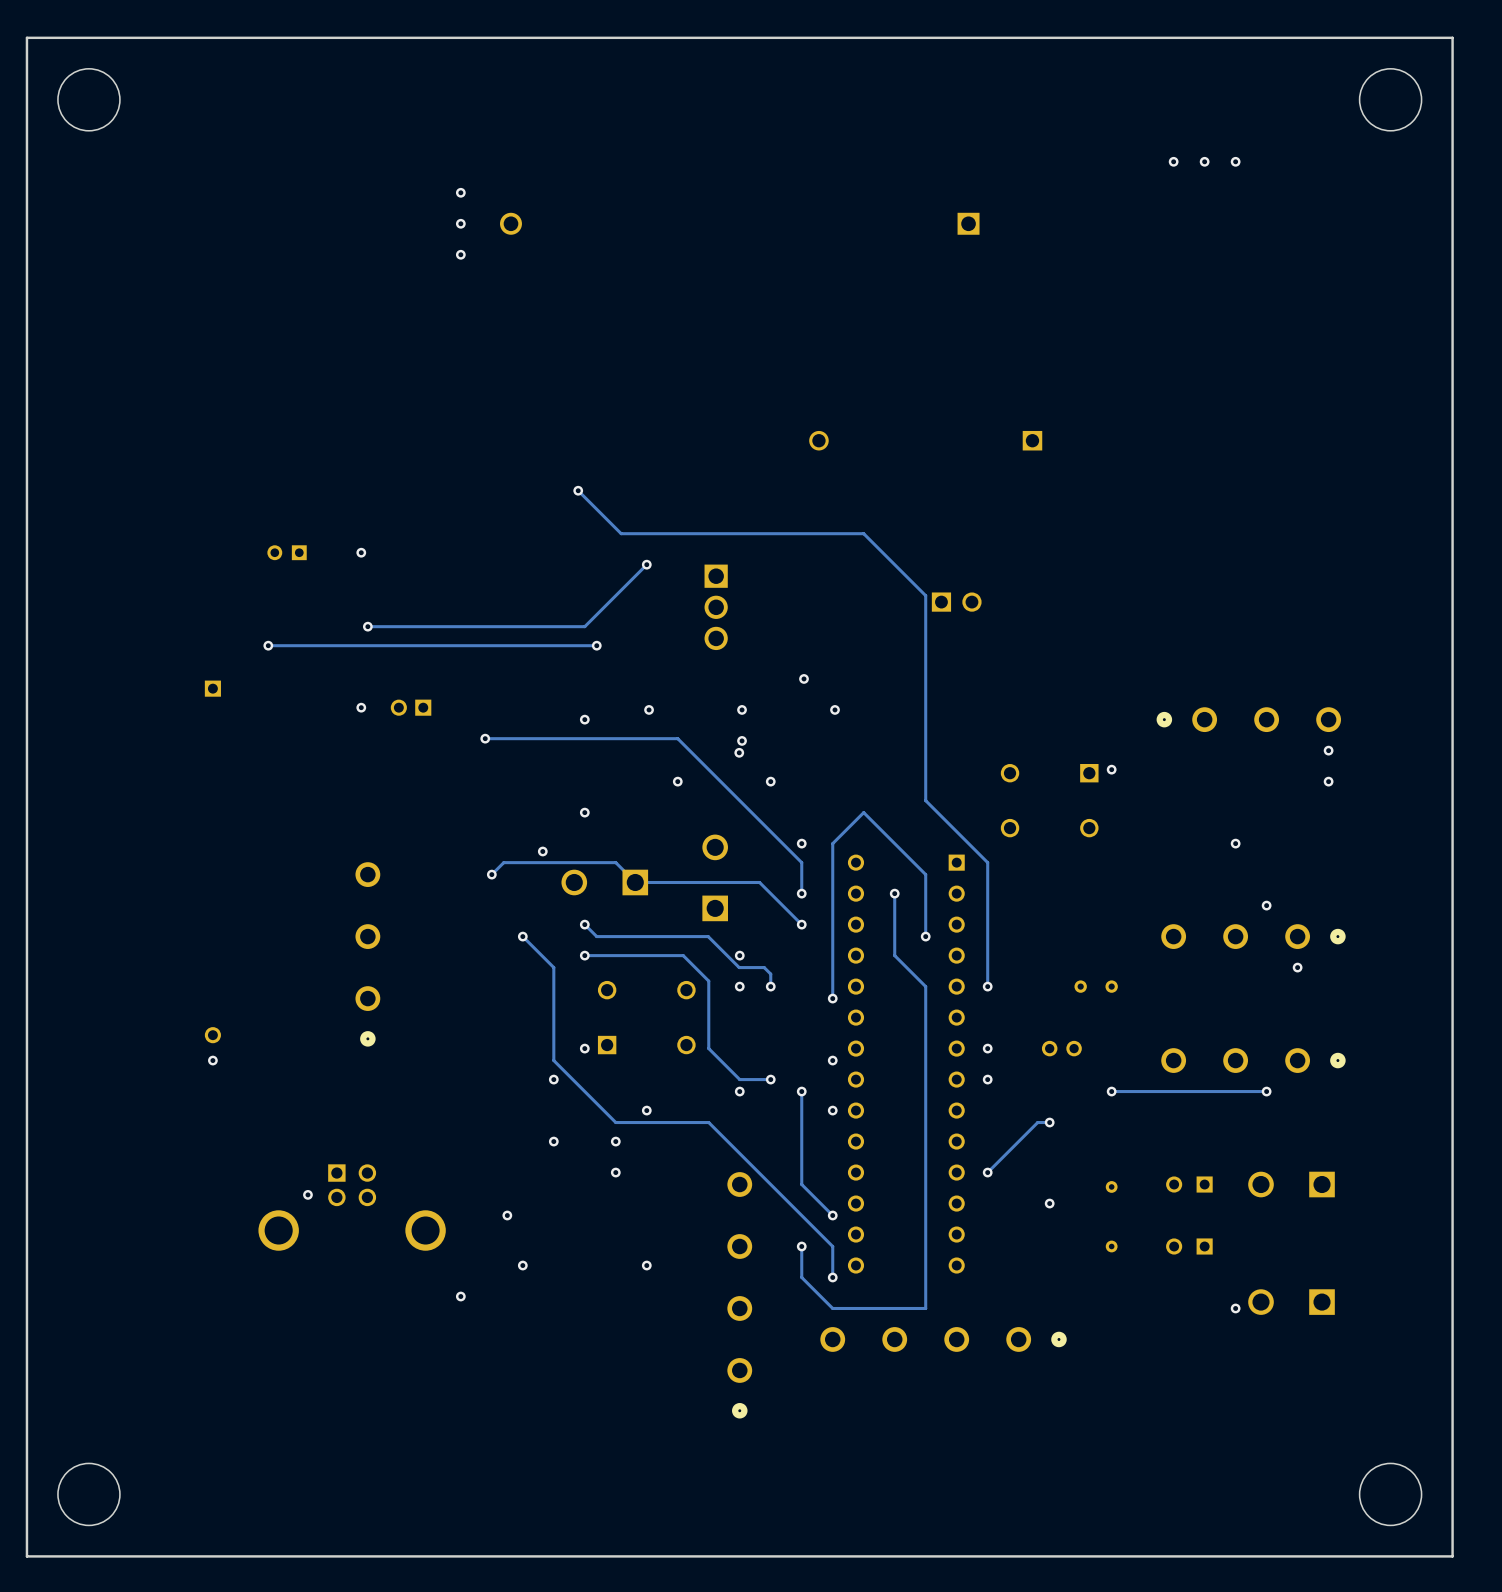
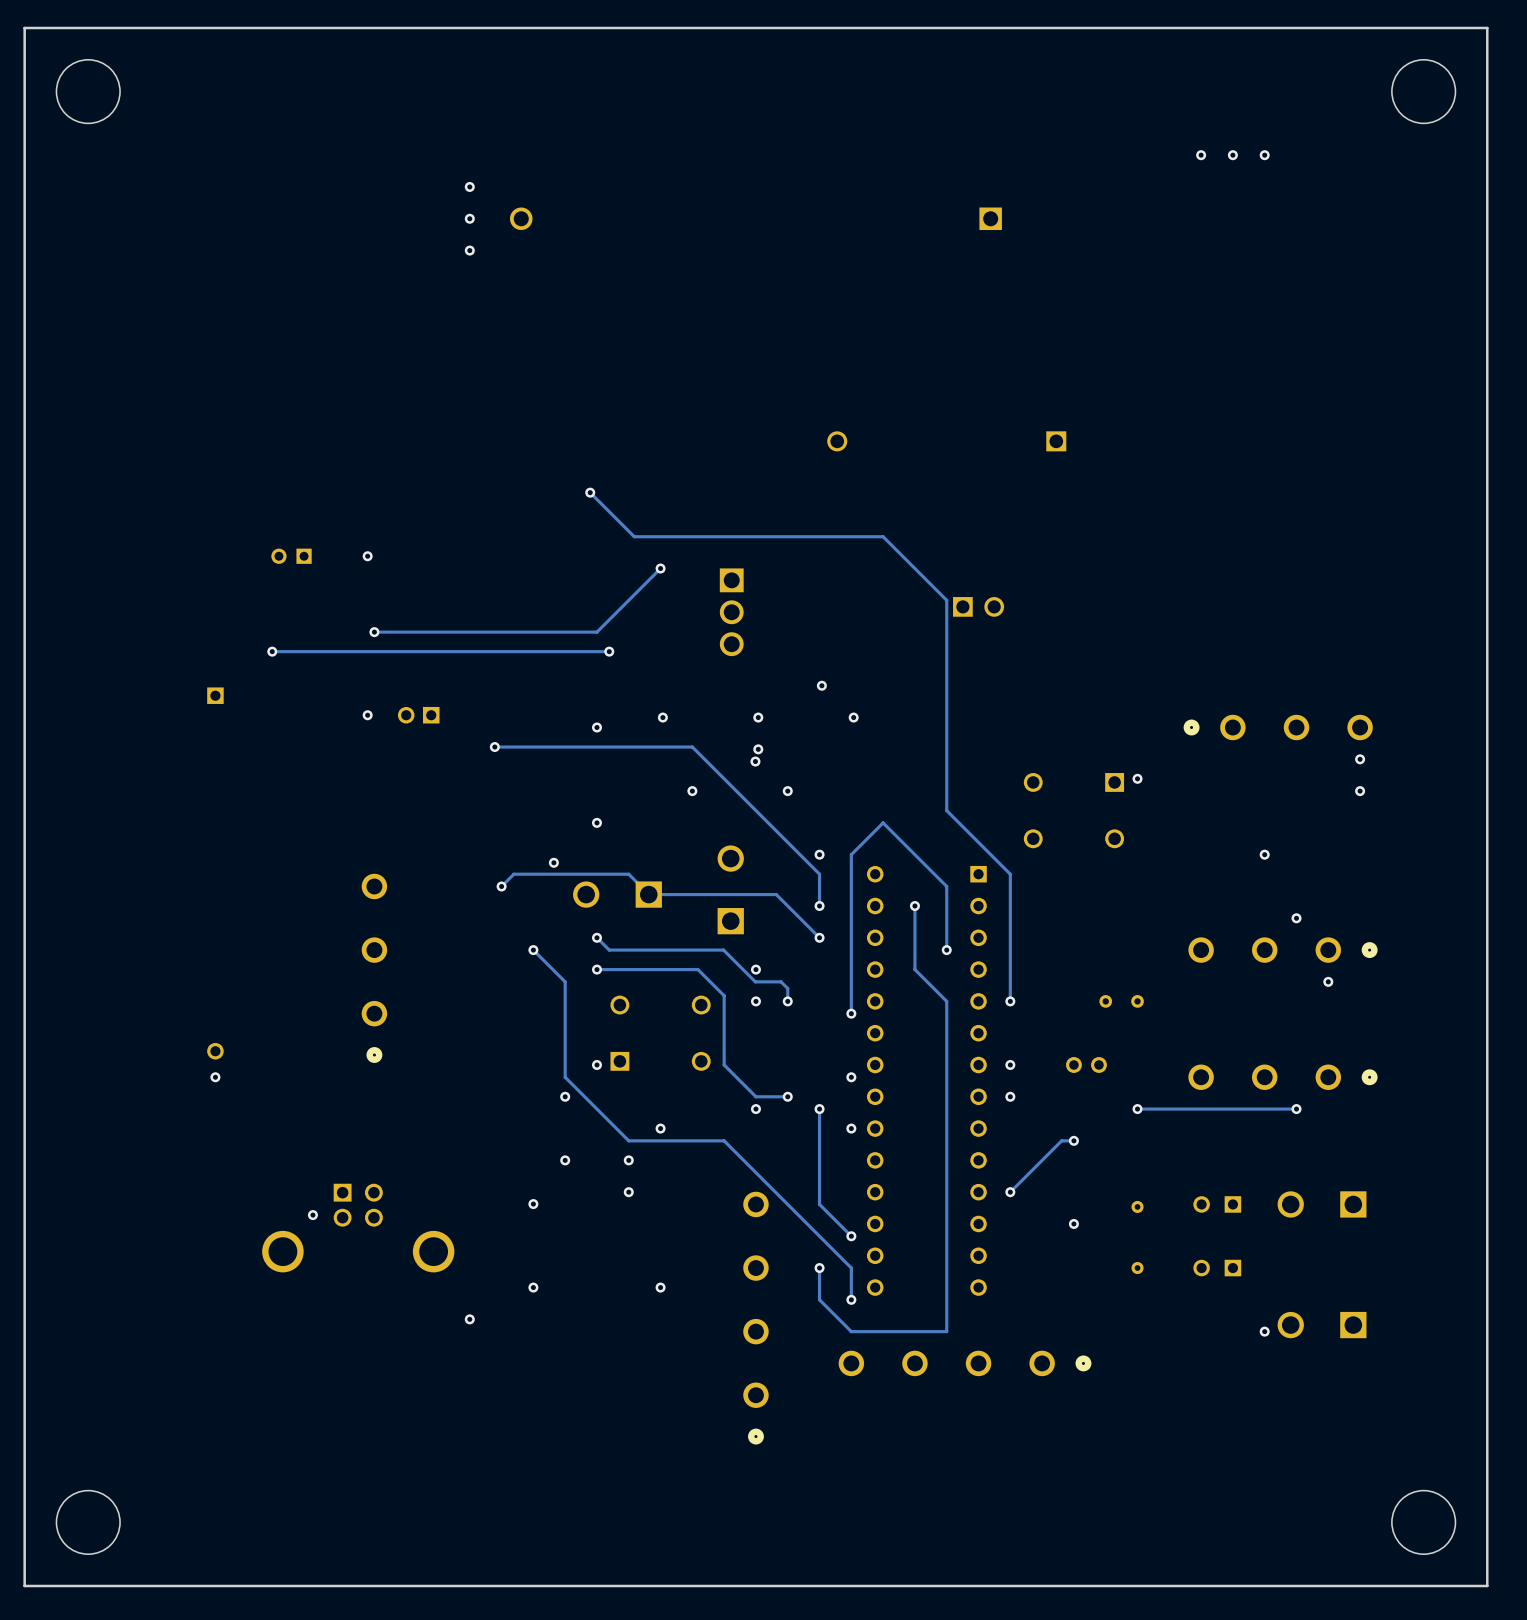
via position: (507, 1215) -> (533, 1204)

